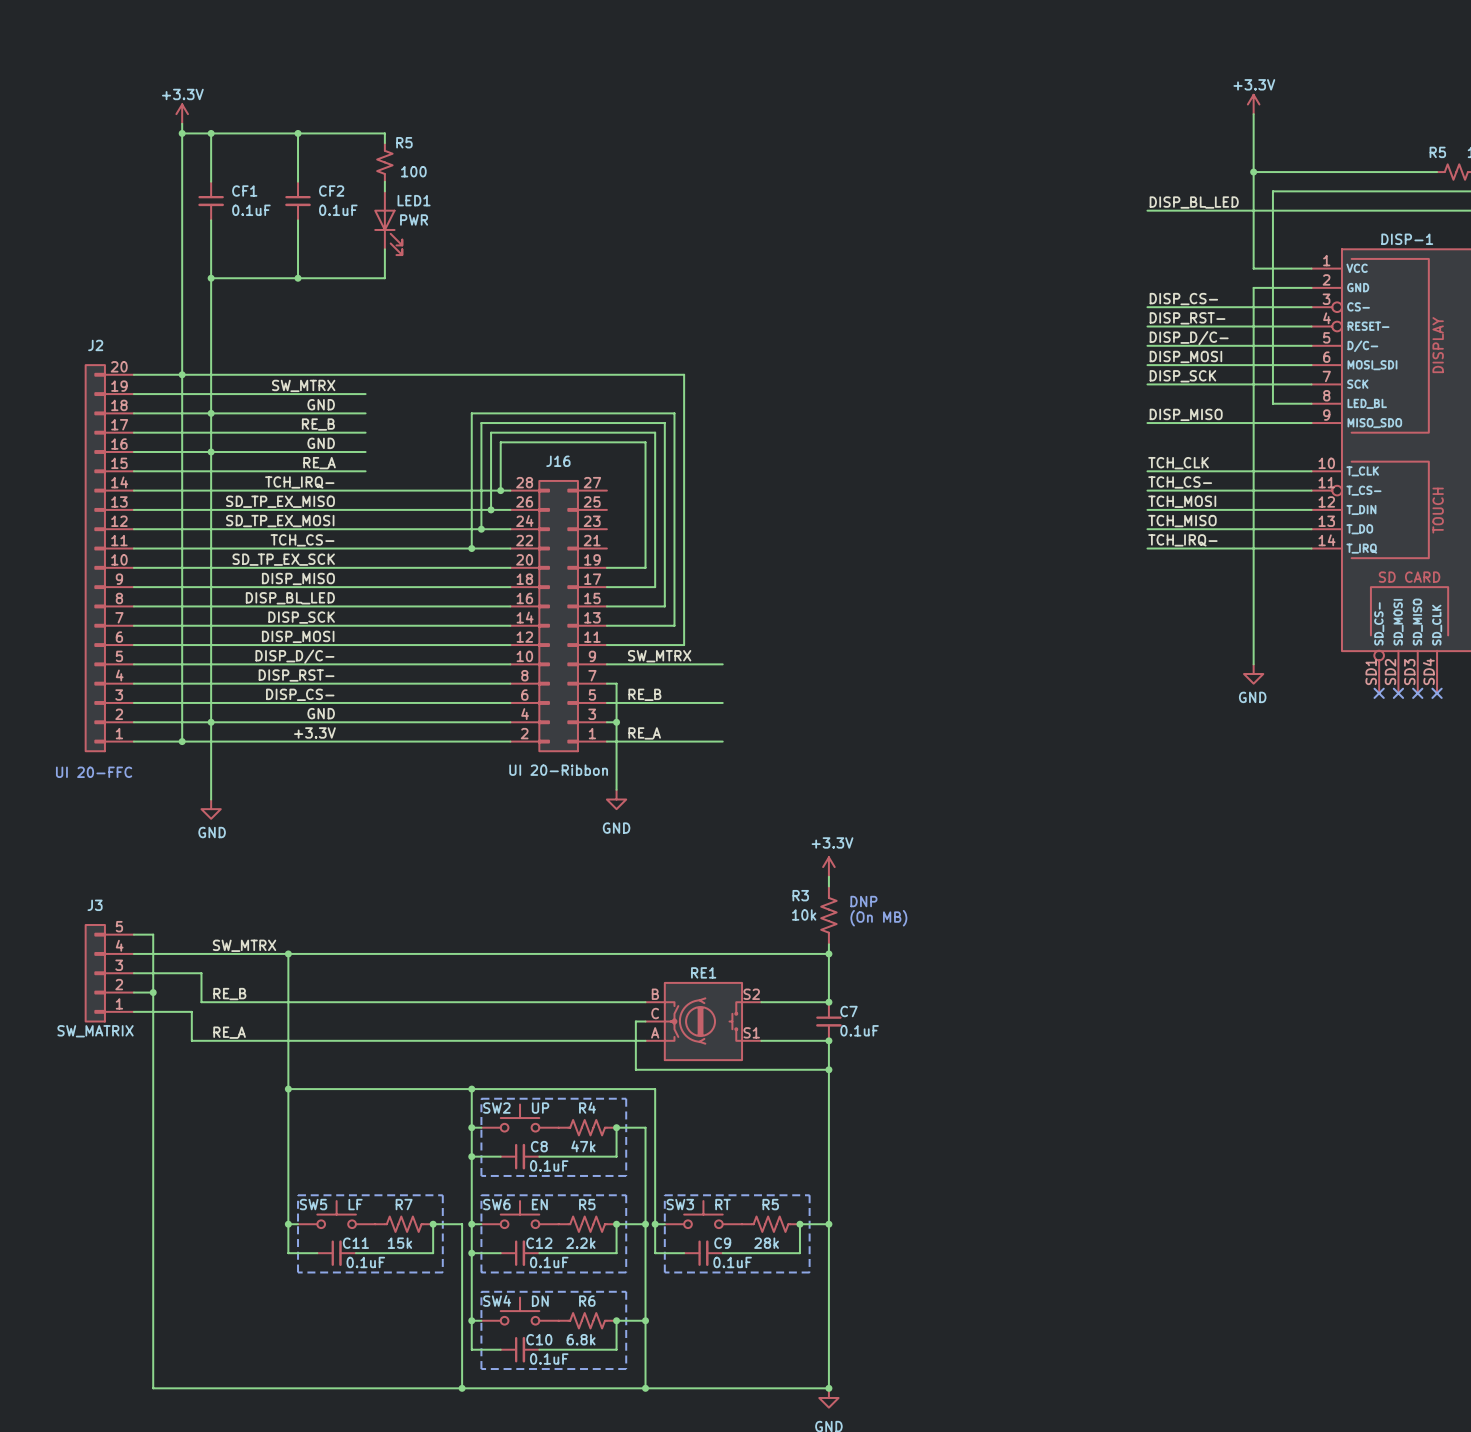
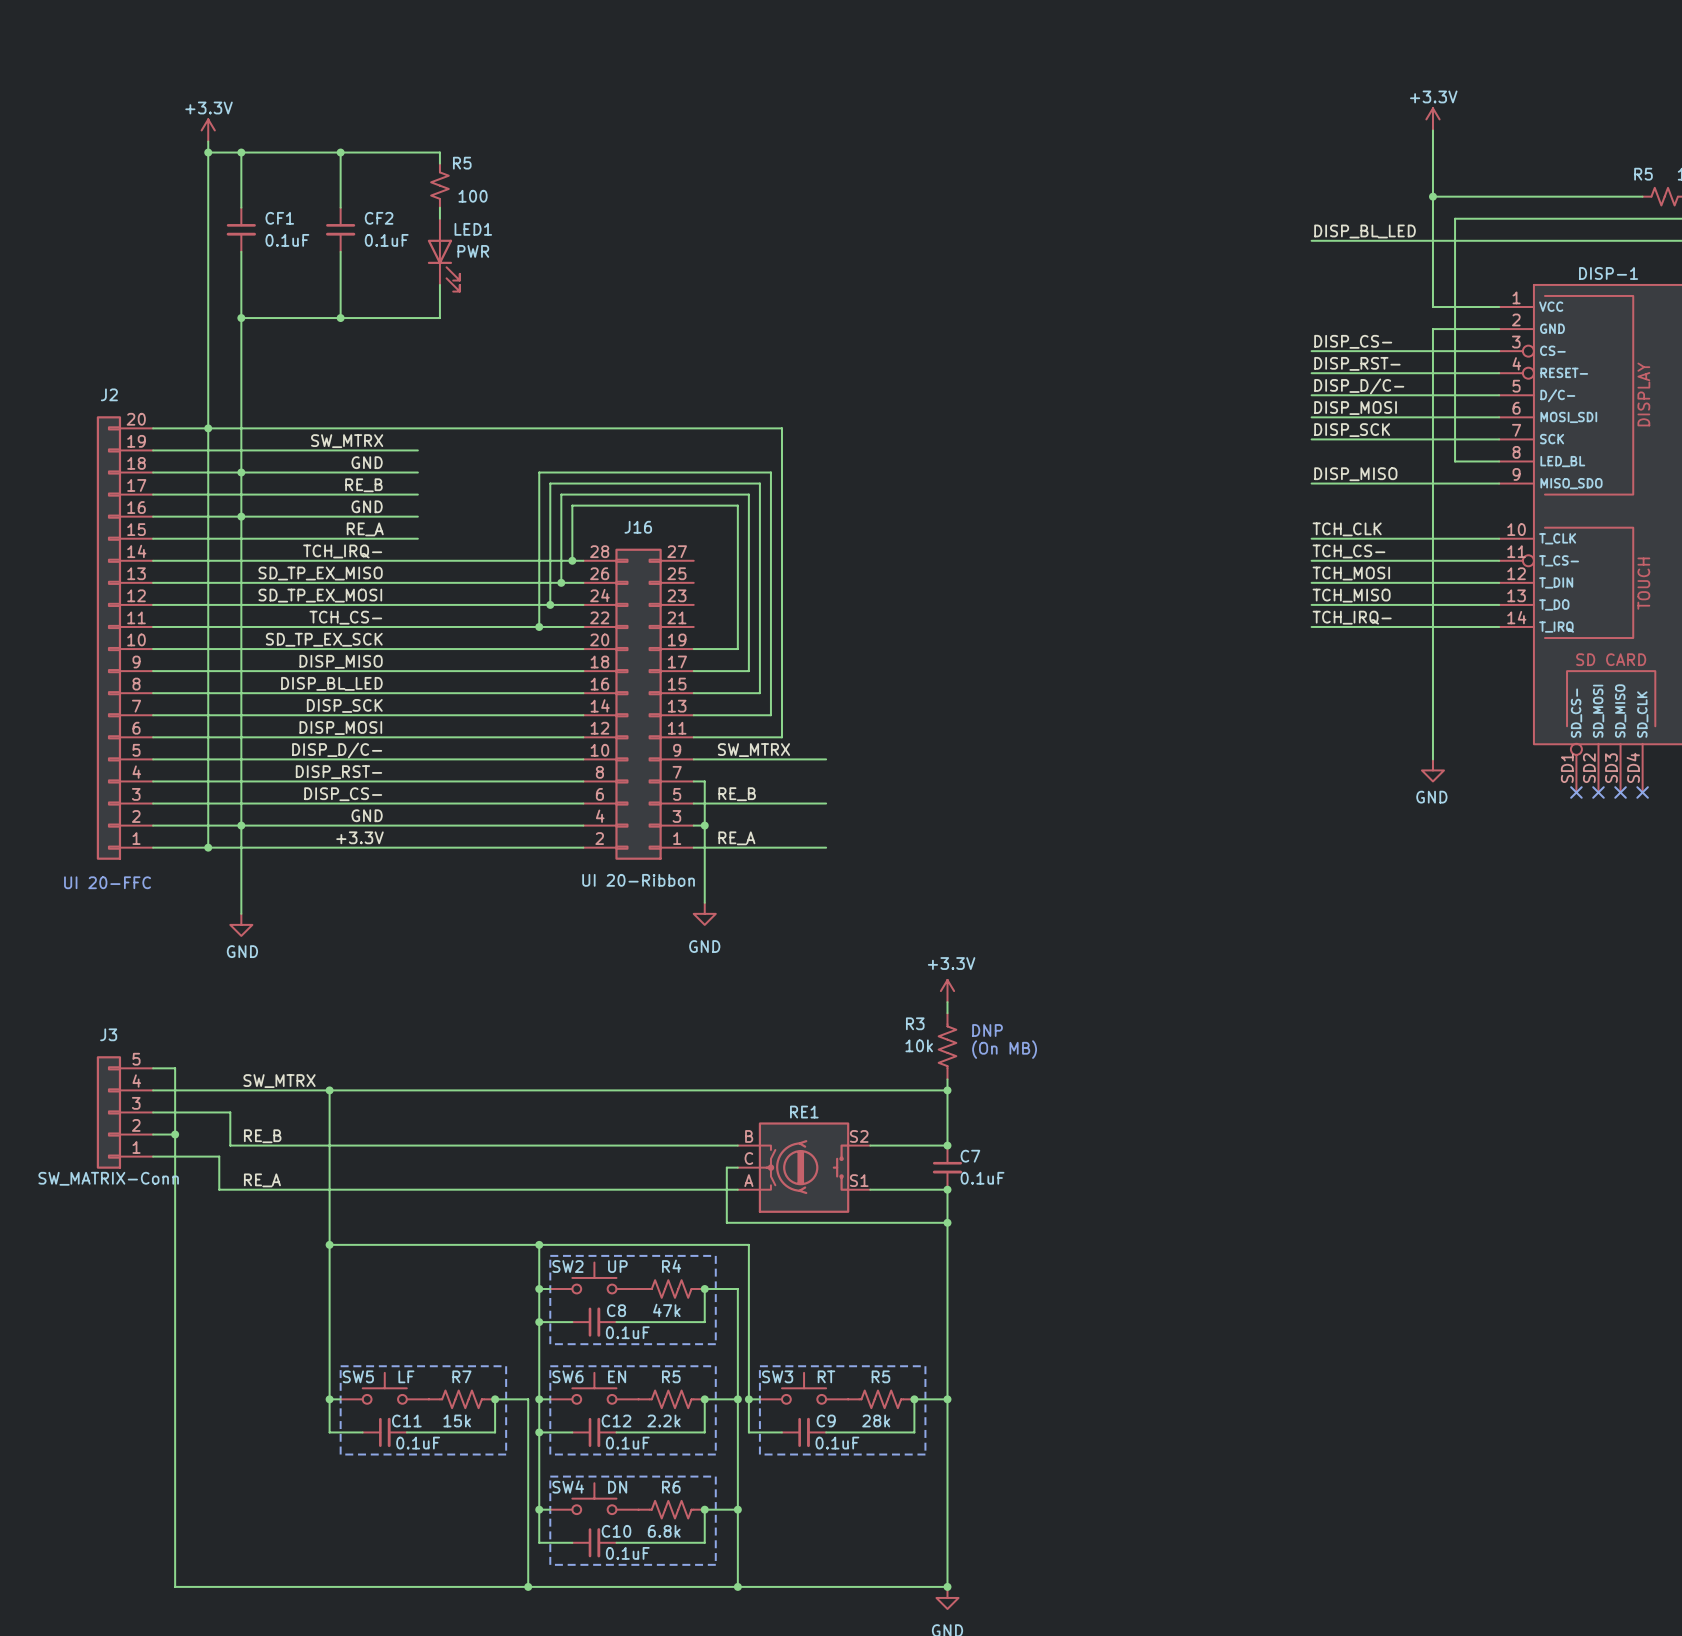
J3 value: SW_MATRIX (95, 1031) -> SW_MATRIX-Conn (108, 1178)

